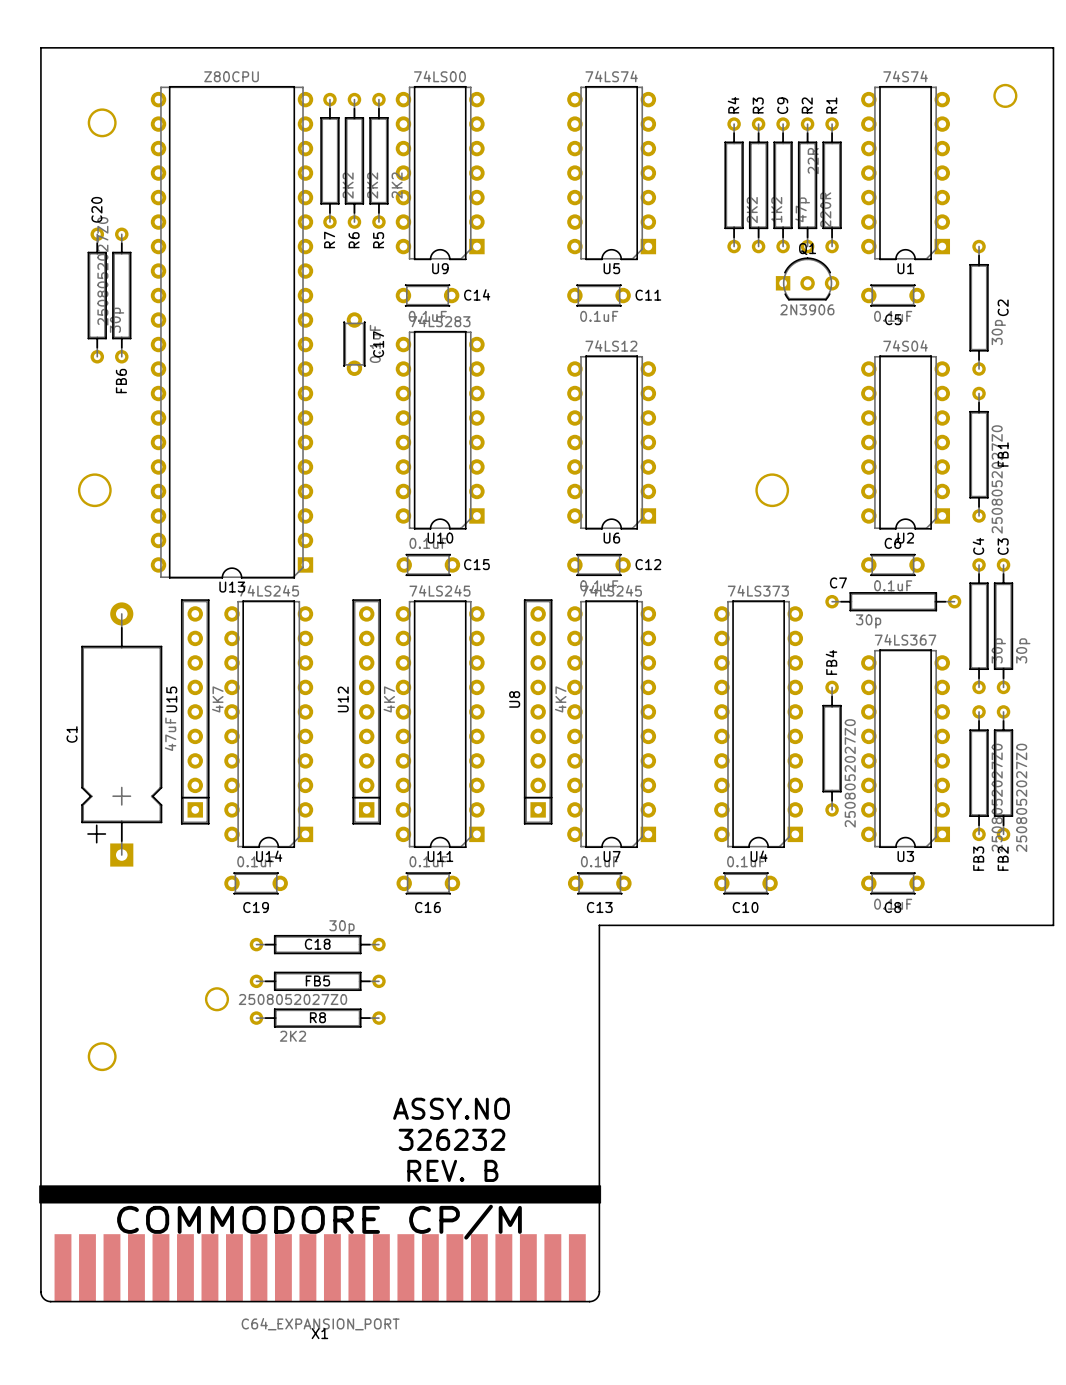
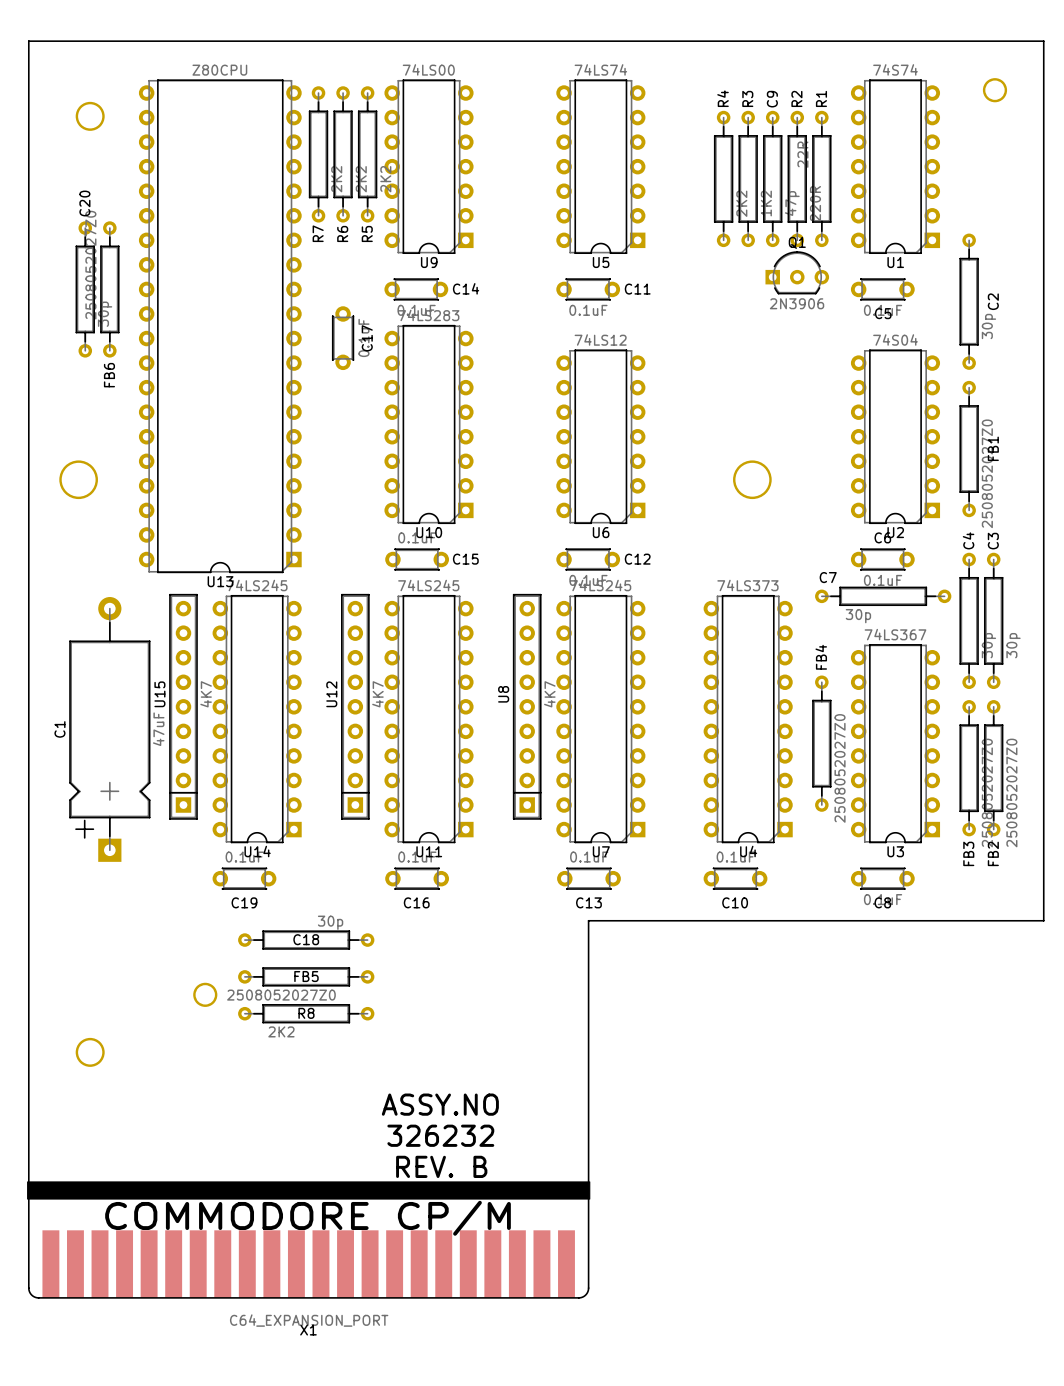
X1 footprint: [39, 47, 1054, 1302] -> [27, 41, 1044, 1299]

